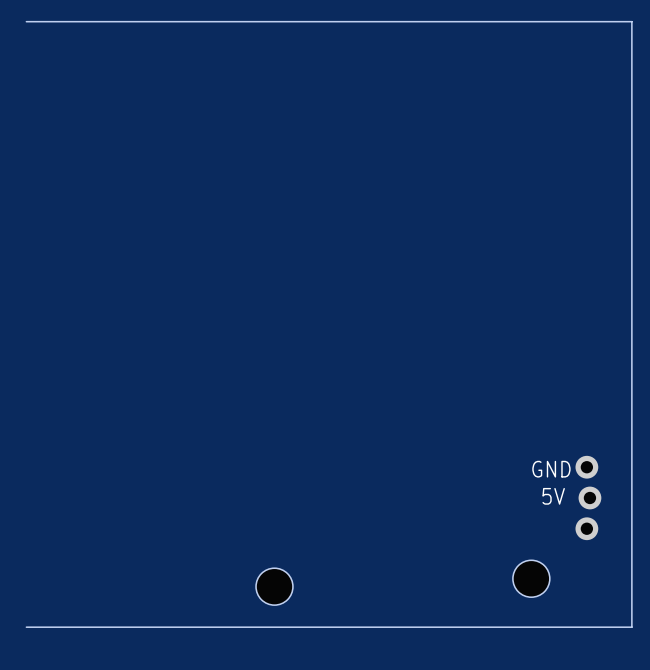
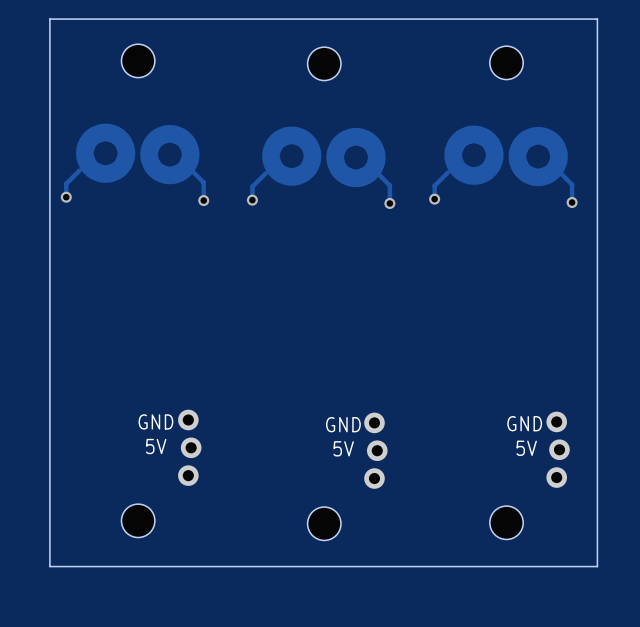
board edge: none -> (49, 19) (49, 566)
part: none -> (138, 60)
part: none -> (506, 62)
part: none -> (324, 63)
drawing: none -> [76, 123, 200, 185]
drawing: none -> [444, 125, 568, 187]
drawing: none -> [262, 126, 386, 188]
track: none -> (184, 165) (186, 165) (203, 182) (203, 200)
track: none -> (552, 167) (555, 167) (572, 184) (572, 202)
track: none -> (370, 168) (372, 168) (389, 185) (389, 203)
track: none -> (79, 170) (66, 183) (66, 197)
track: none -> (447, 172) (434, 185) (434, 199)
track: none -> (265, 173) (252, 186) (252, 200)
via: none -> (66, 197)
via: none -> (434, 199)
via: none -> (252, 200)
via: none -> (203, 200)
via: none -> (572, 202)
via: none -> (389, 203)
text: none -> GND (155, 421)
text: none -> GND (343, 424)
text: none -> 5V (156, 446)
part: none -> (189, 447)
text: none -> 5V (343, 448)
part: none -> (375, 450)
part: none -> (138, 520)
part position: (274, 586) -> (324, 523)

